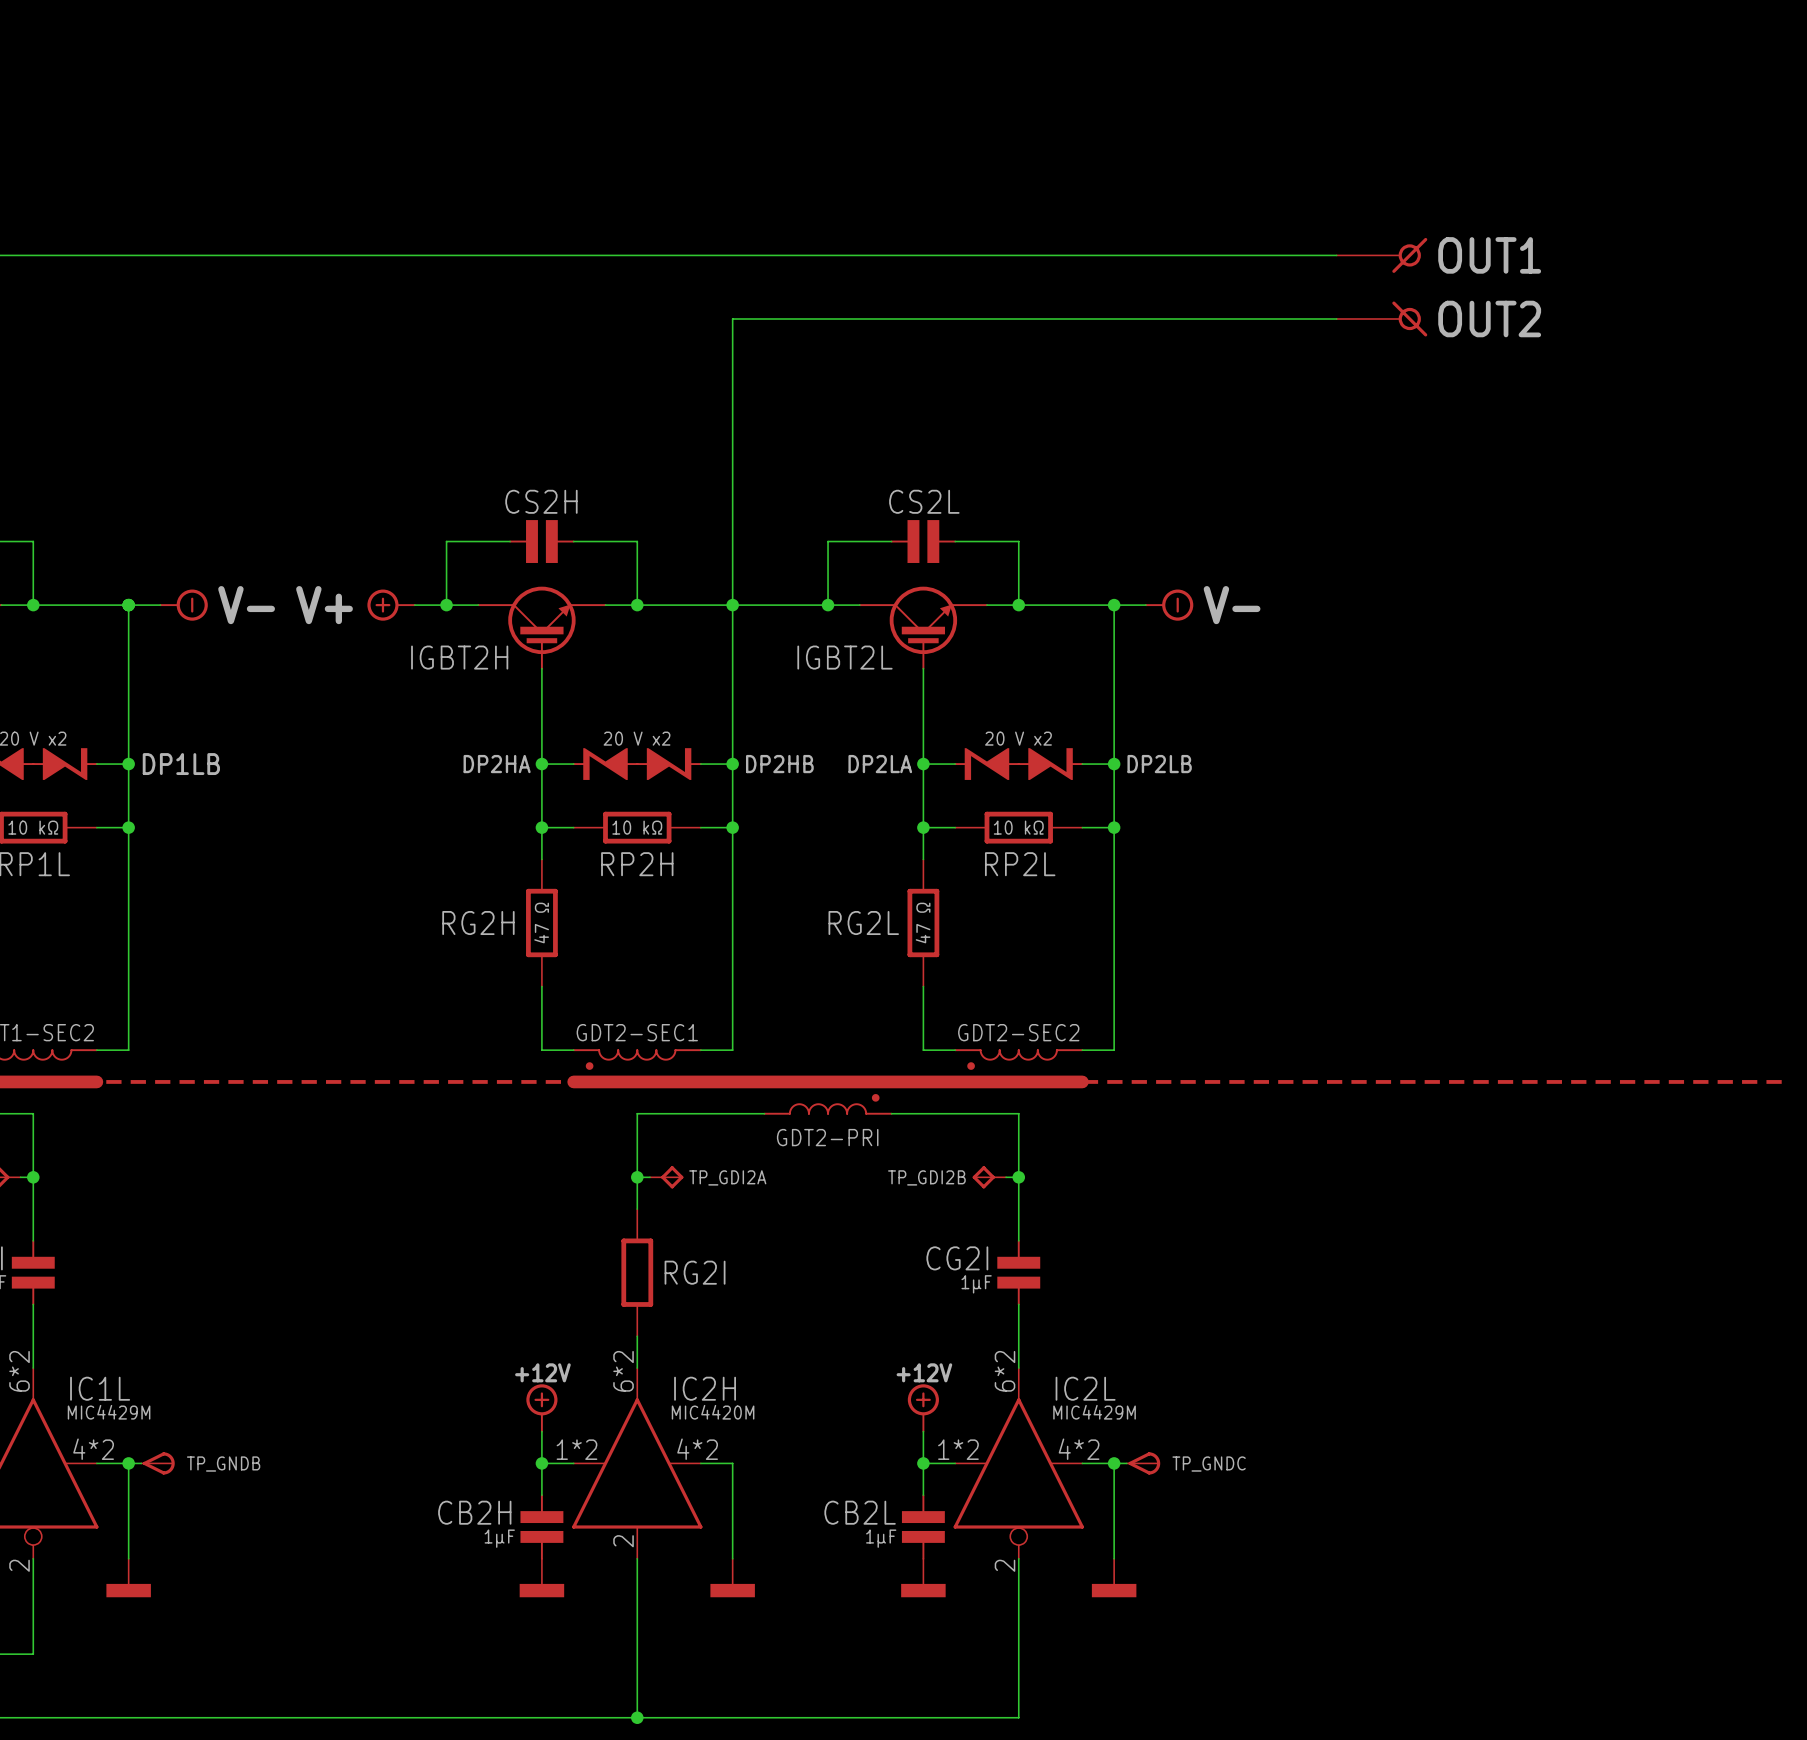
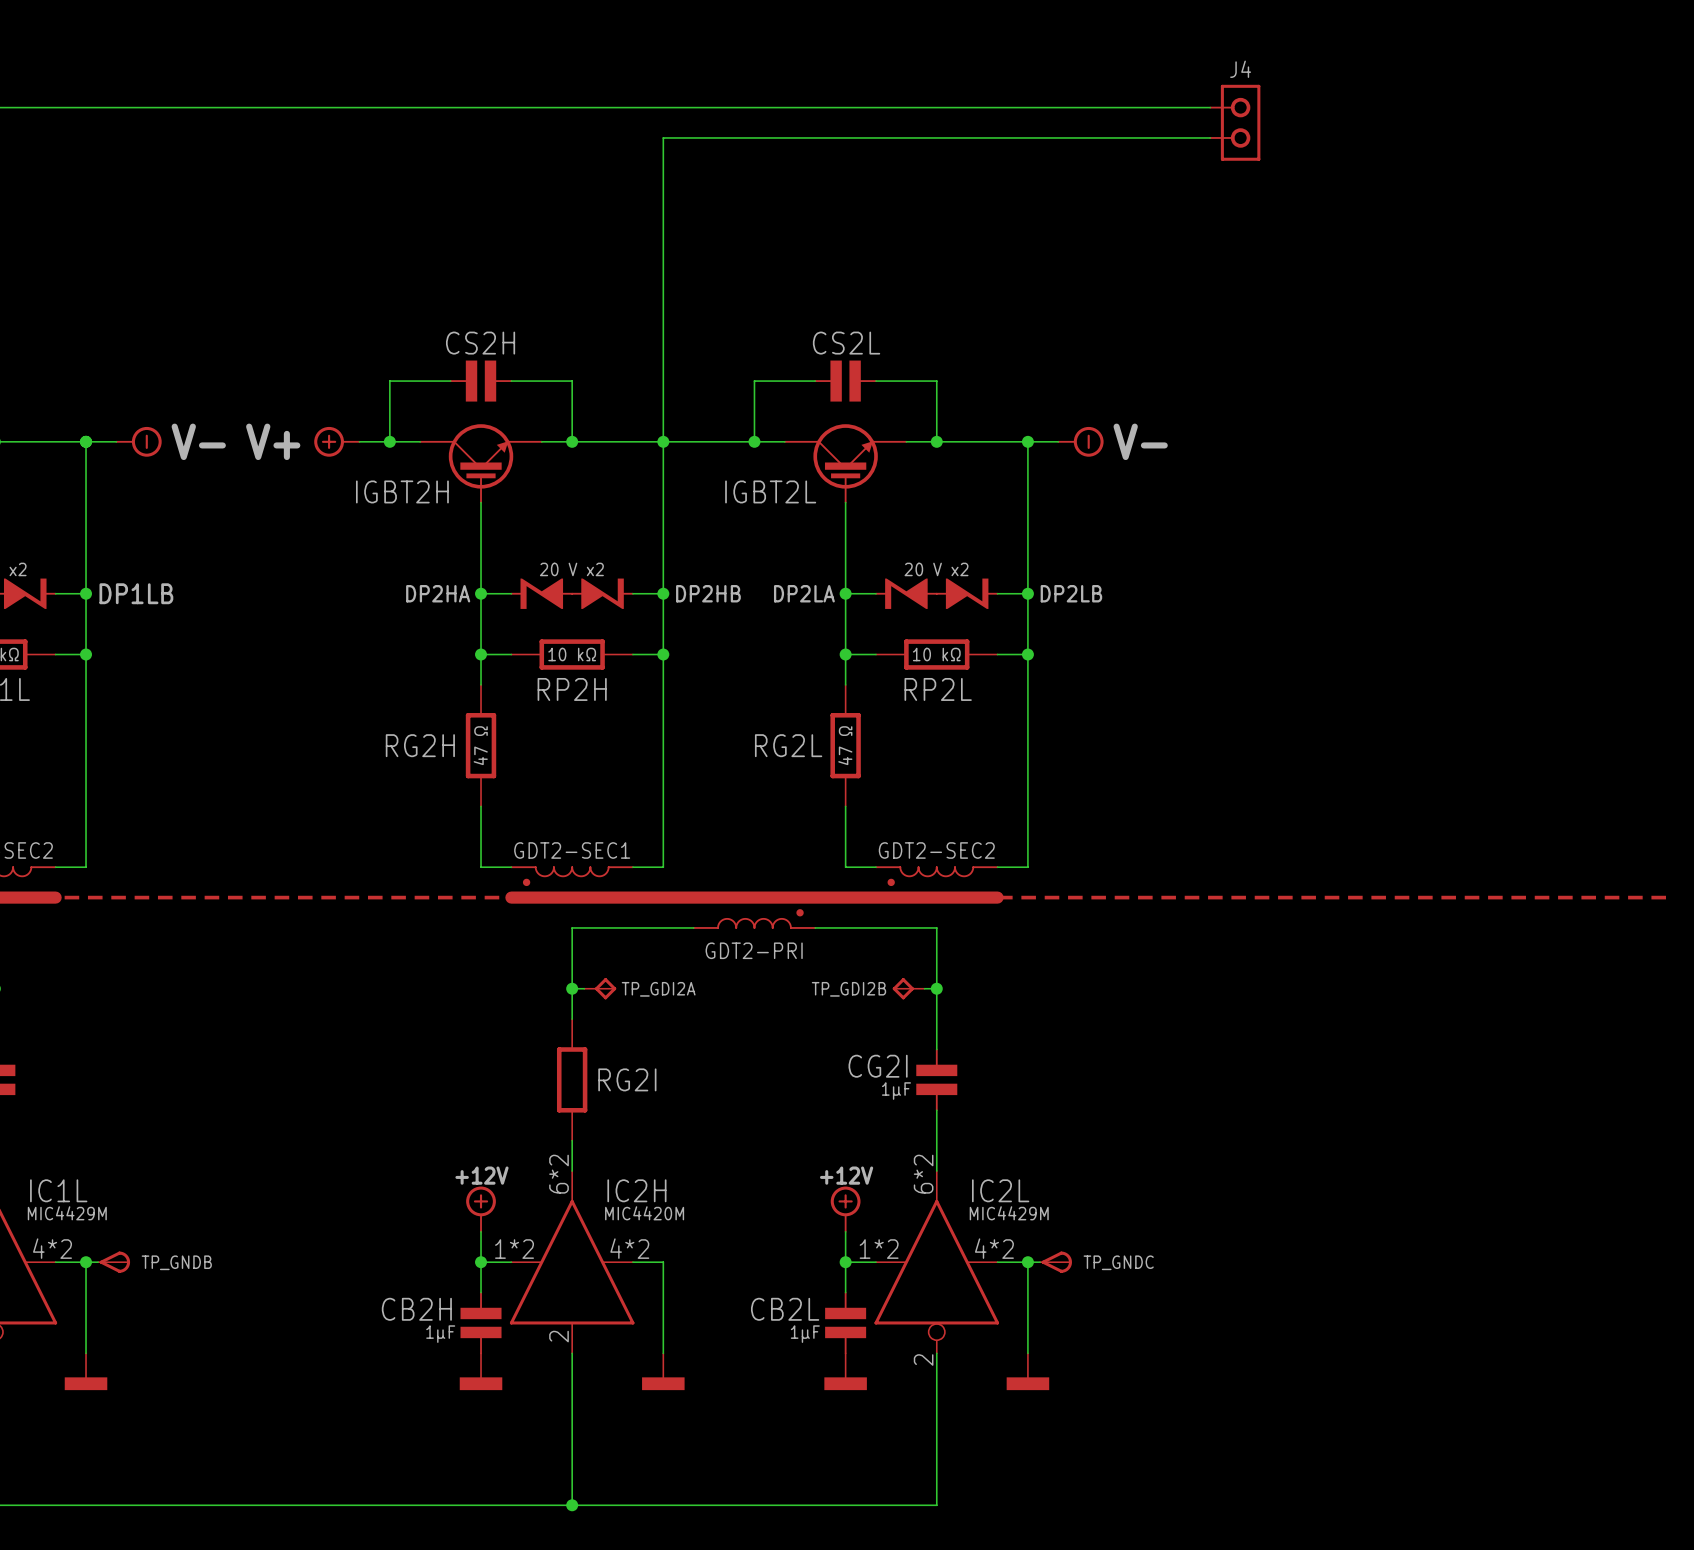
part: OUT1 (1381, 255) -> none
J4: none -> (1234, 122)
wire: (732, 319) (1336, 319) -> (663, 168) (663, 137) (1210, 137)
part: OUT2 (1381, 319) -> none

